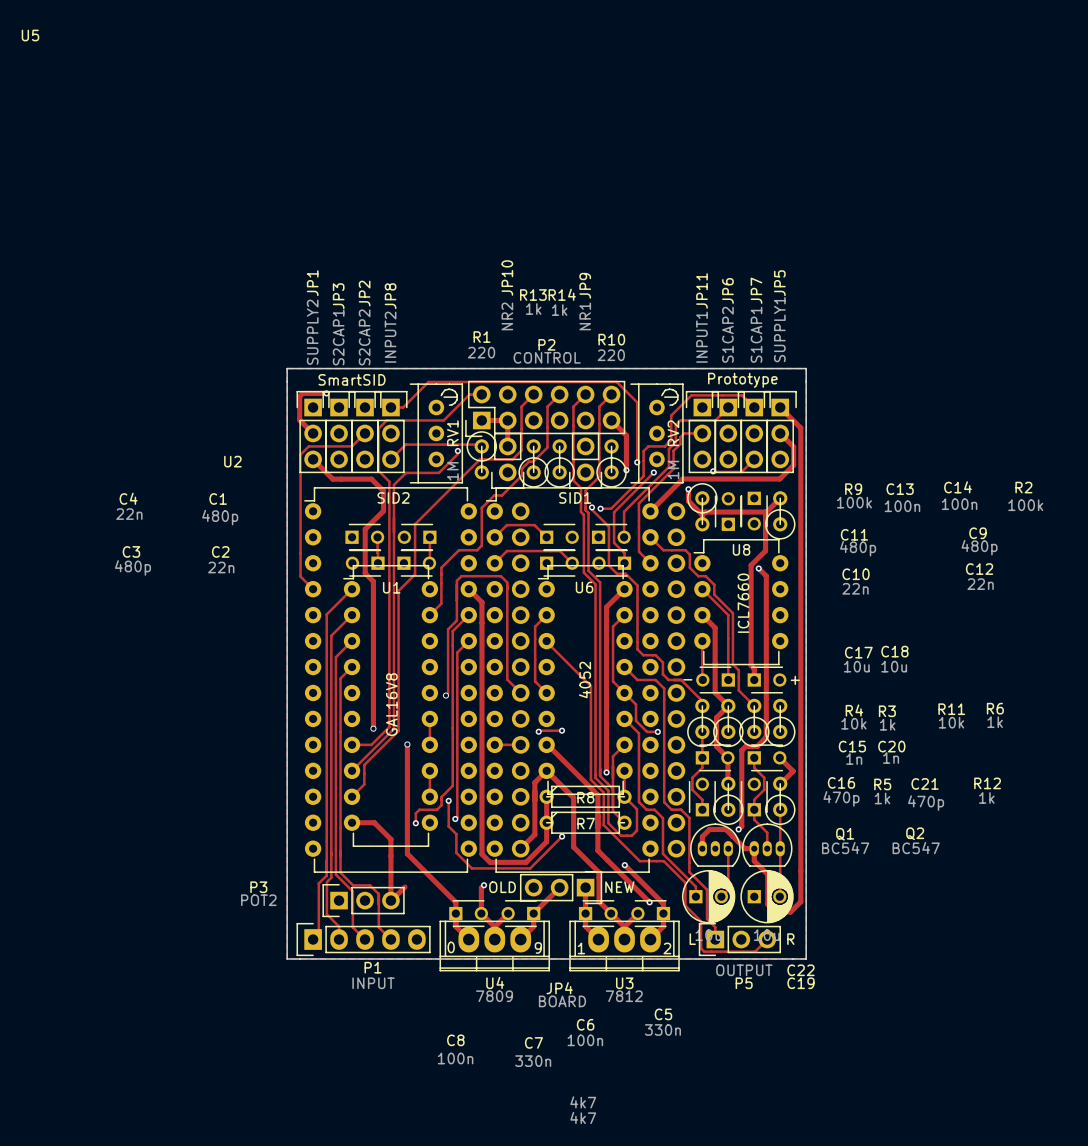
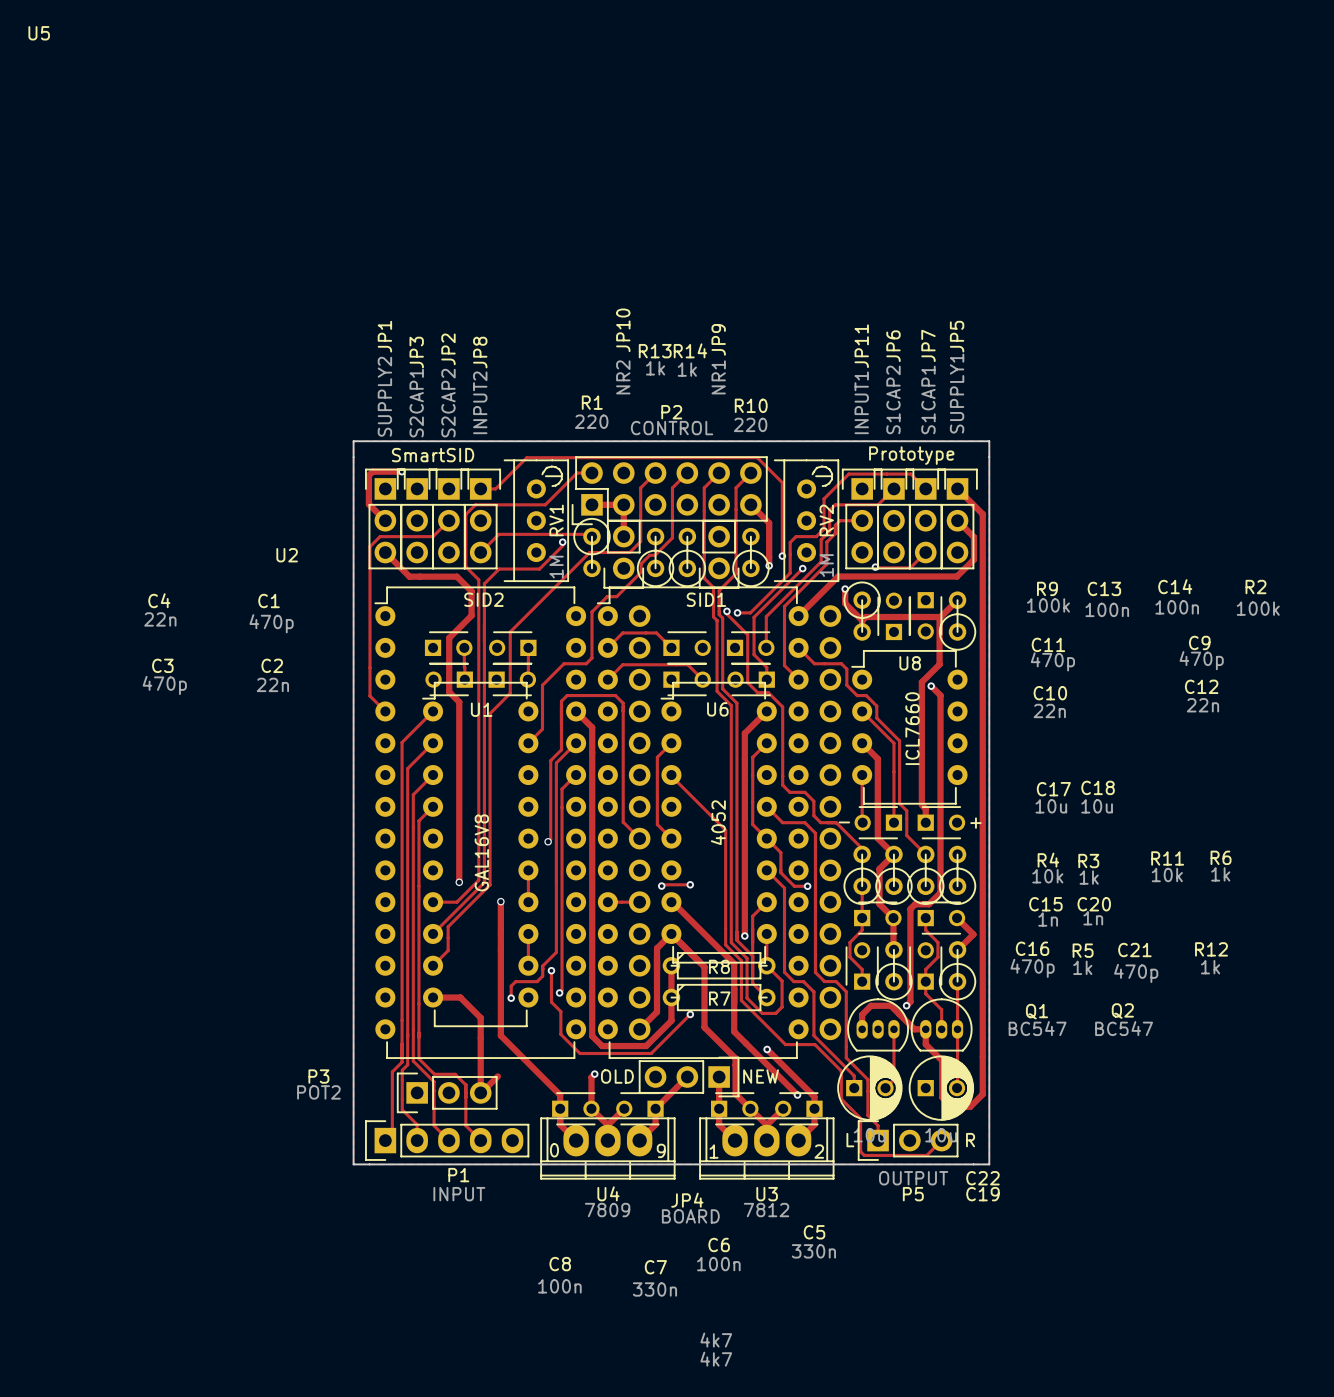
C1 value: 480p (220, 517) -> 470p (271, 623)
C9 value: 480p (979, 547) -> 470p (1201, 660)
C11 value: 480p (858, 548) -> 470p (1052, 661)
C3 value: 480p (132, 567) -> 470p (164, 685)

